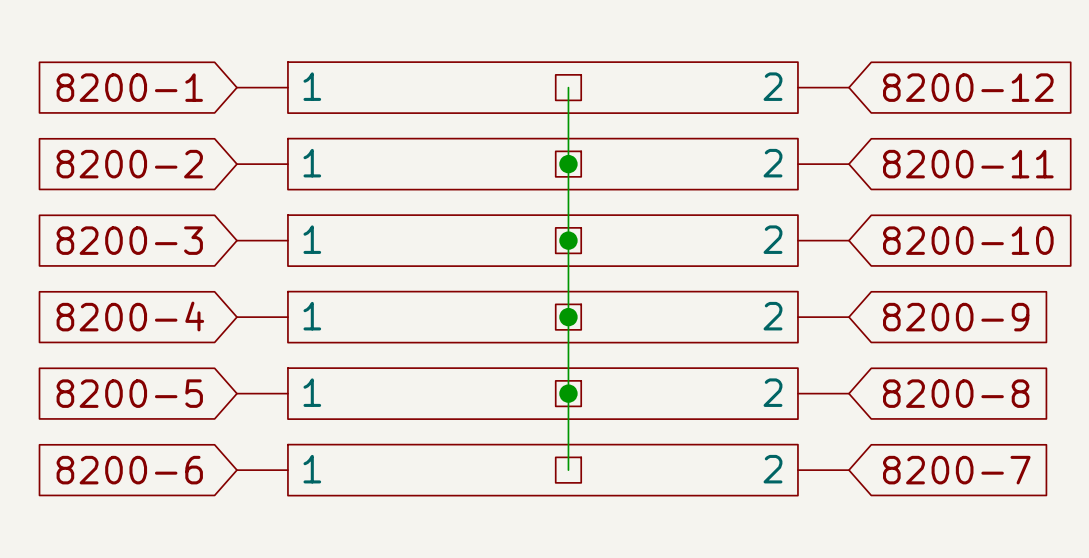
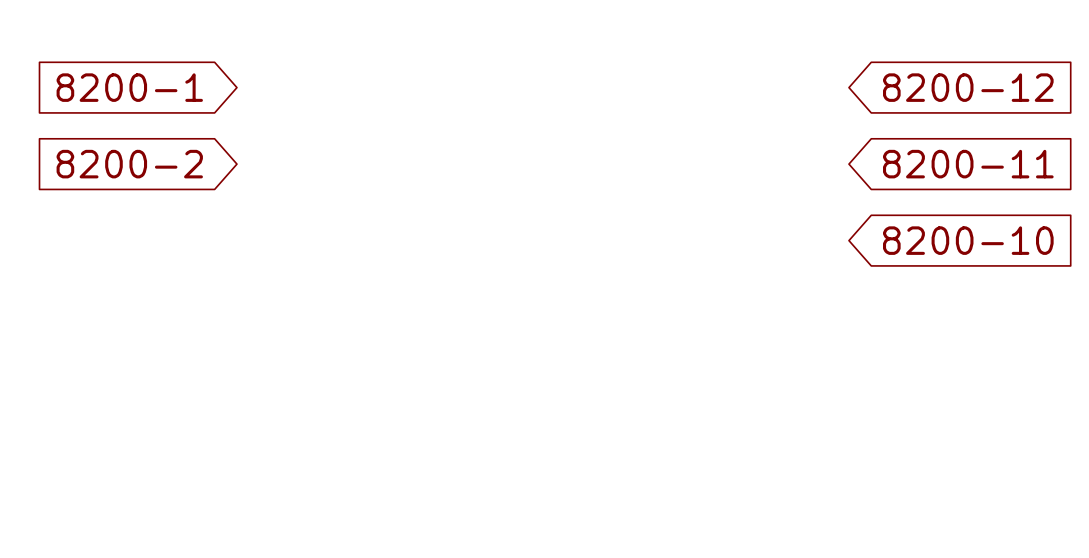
part: (542, 87) -> none
wire: (568, 87) (568, 470) -> none
part: (542, 164) -> none
junction: (568, 164) -> none
global label: 8200-3 (129, 240) -> none
part: (542, 240) -> none
junction: (568, 240) -> none
global label: 8200-4 (130, 316) -> none
part: (542, 317) -> none
junction: (568, 317) -> none
global label: 8200-9 (956, 317) -> none
global label: 8200-5 (129, 393) -> none
part: (542, 393) -> none
junction: (568, 393) -> none
global label: 8200-8 (956, 393) -> none
global label: 8200-6 (129, 470) -> none
part: (542, 470) -> none
global label: 8200-7 (956, 470) -> none

